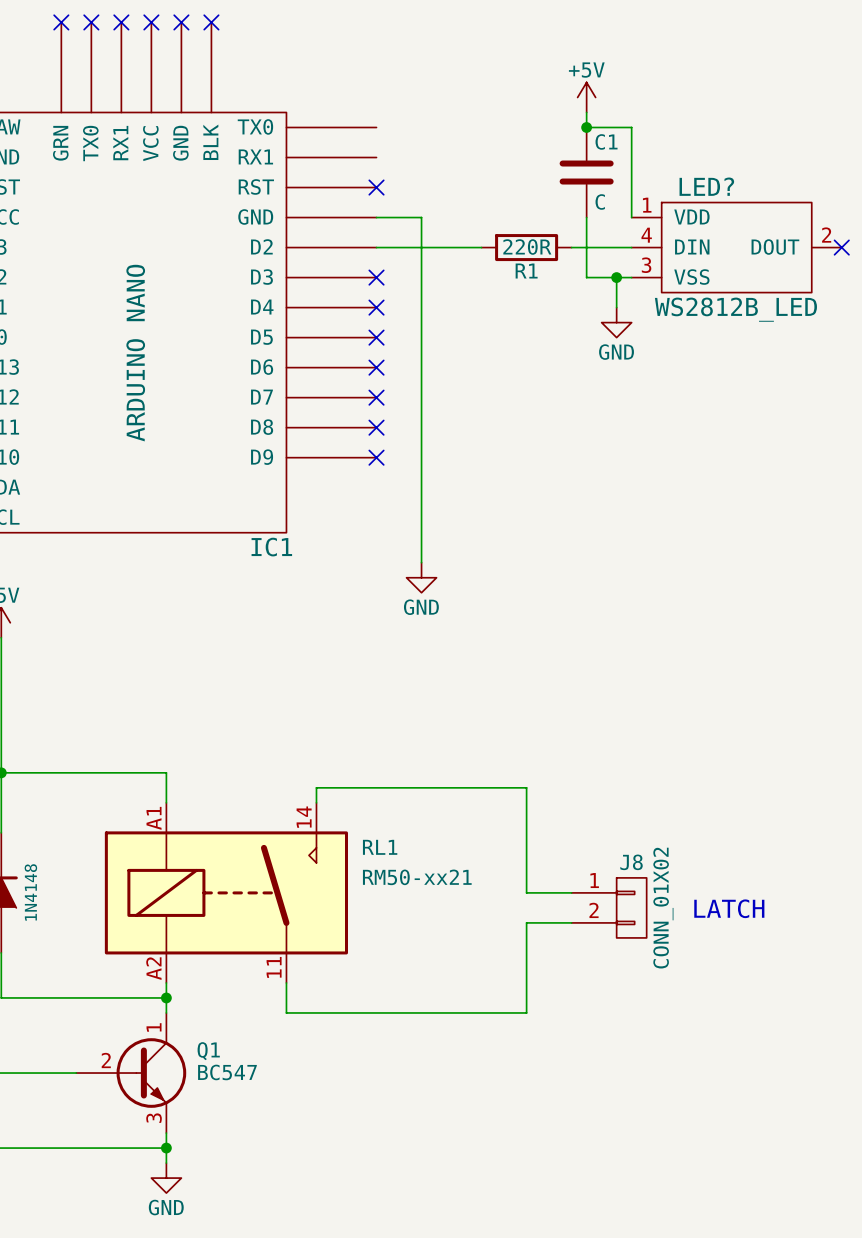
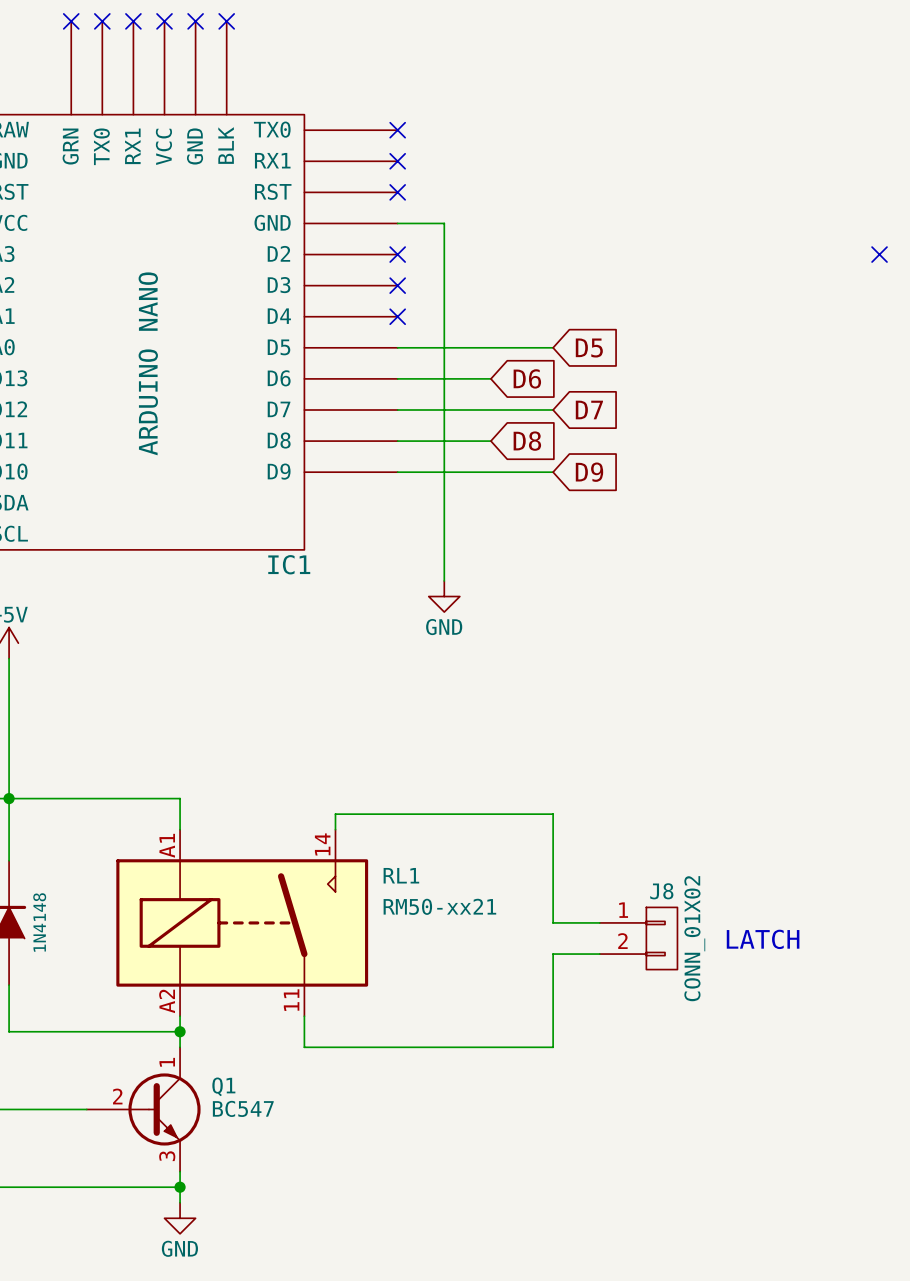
power symbol: +5V (586, 97) -> none
wire: (586, 112) (586, 127) (631, 127) (631, 217) -> none
no-connect mark: none -> (397, 130)
junction: (586, 127) -> none
no-connect mark: none -> (397, 161)
C1: C (586, 172) -> none
wire: (586, 217) (586, 277) (631, 277) -> none
wire: (376, 247) (481, 247) -> none
no-connect mark: none -> (397, 254)
R1: 220R (526, 247) -> none
wire: (571, 247) (631, 247) -> none
LED?: WS2812B_LED (736, 247) -> none
wire: (616, 277) (616, 307) -> none
junction: (616, 277) -> none
power symbol: GND (616, 322) -> none
wire: none -> (397, 347) (553, 347)
no-connect mark: (376, 337) -> none
global label: none -> D5 (589, 348)
wire: none -> (397, 378) (490, 378)
no-connect mark: (376, 367) -> none
global label: none -> D6 (527, 378)
wire: none -> (397, 409) (553, 409)
no-connect mark: (376, 397) -> none
global label: none -> D7 (589, 409)
wire: none -> (397, 441) (490, 441)
no-connect mark: (376, 427) -> none
global label: none -> D8 (527, 441)
wire: none -> (397, 472) (553, 472)
no-connect mark: (376, 457) -> none
global label: none -> D9 (589, 472)

